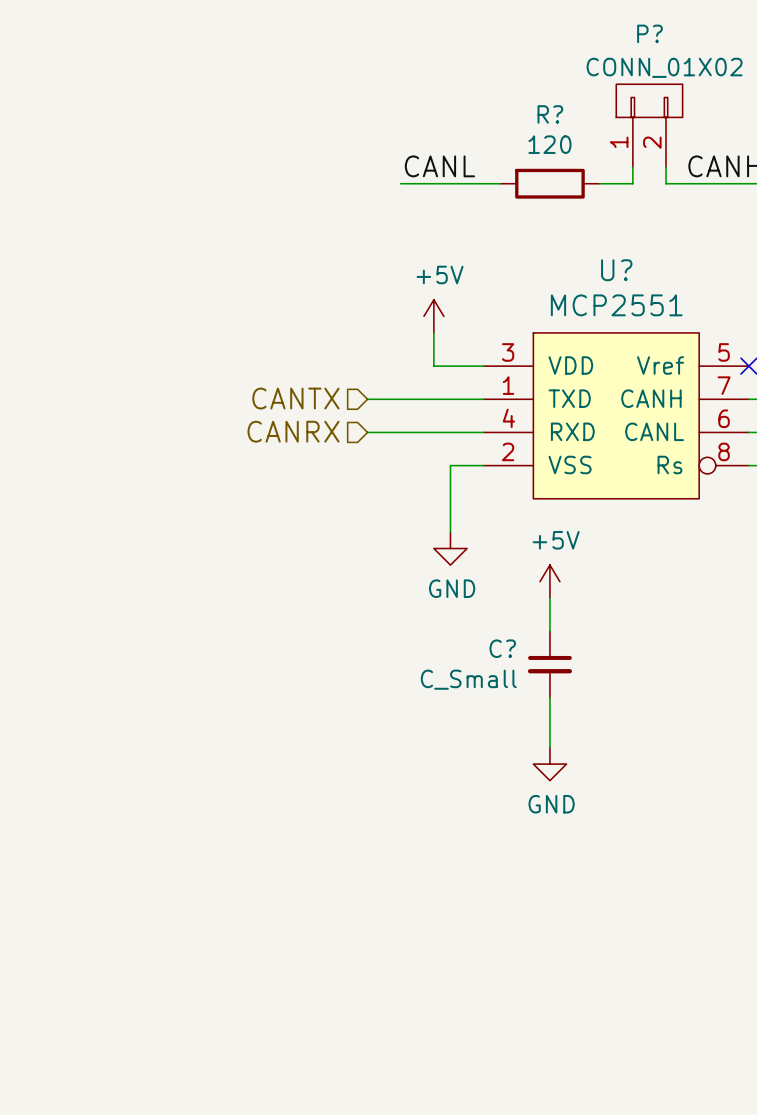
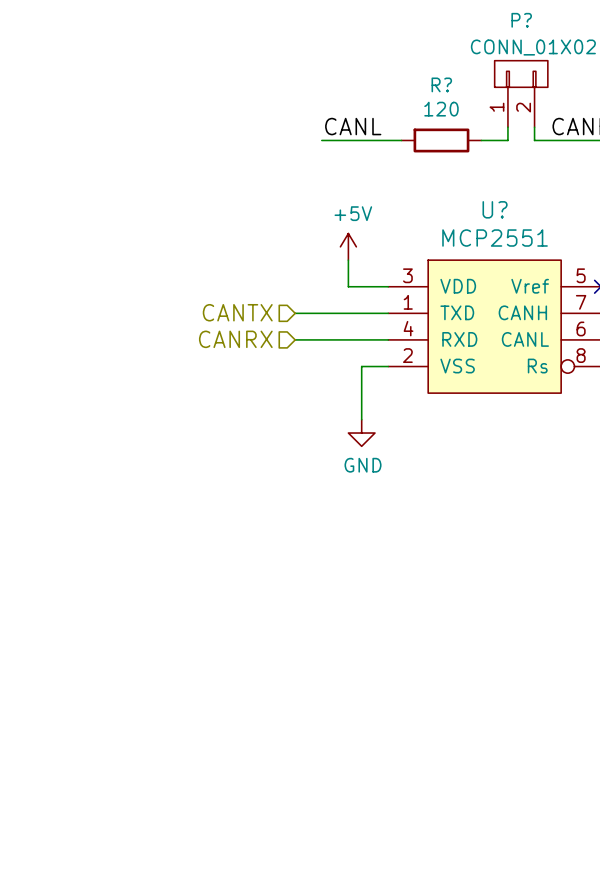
power symbol: +5V (549, 581) -> none
wire: (549, 598) (549, 631) -> none
C?: C_Small (549, 664) -> none
wire: (549, 697) (549, 747) -> none
power symbol: GND (549, 764) -> none

